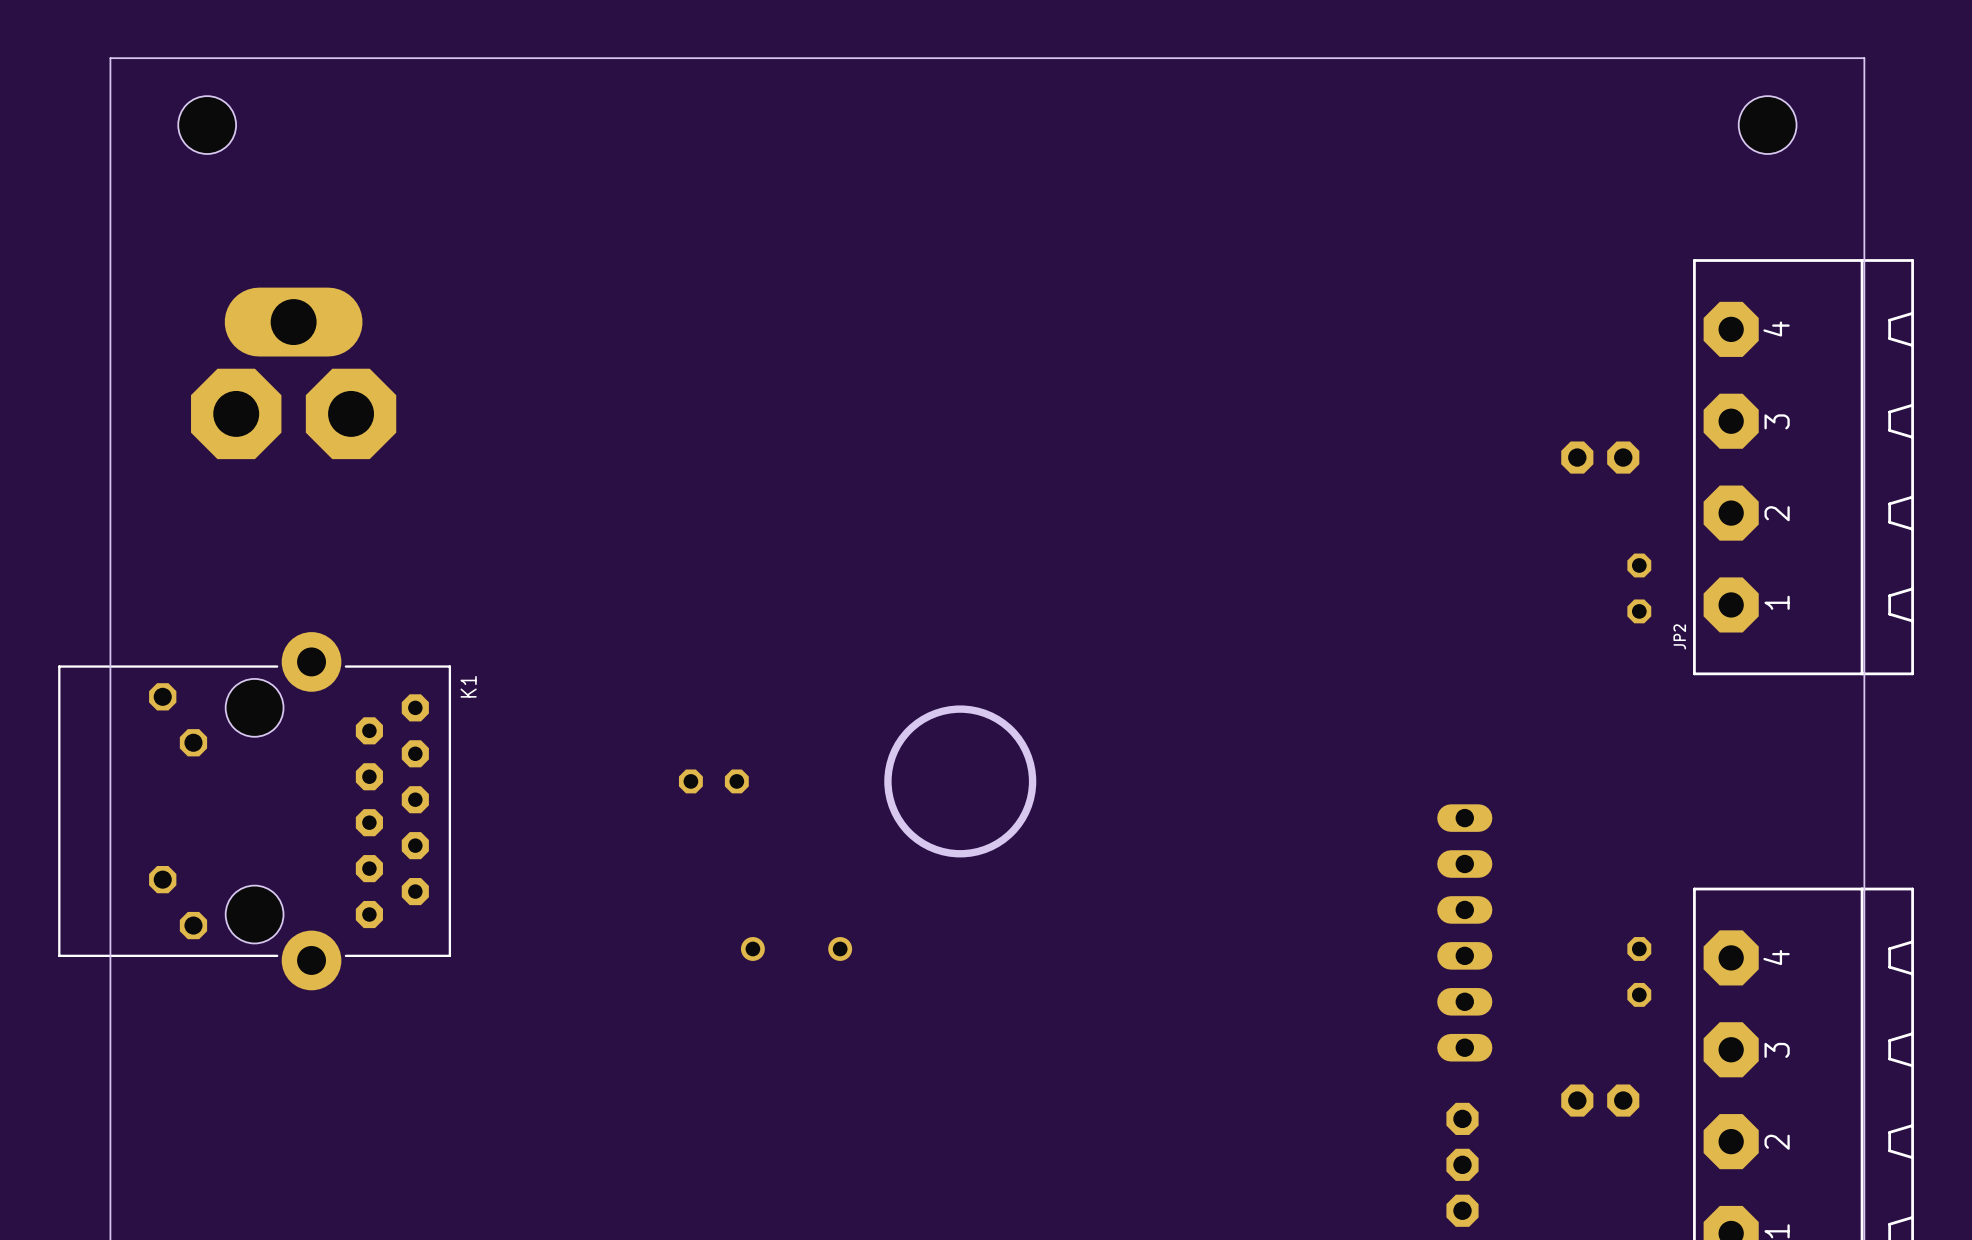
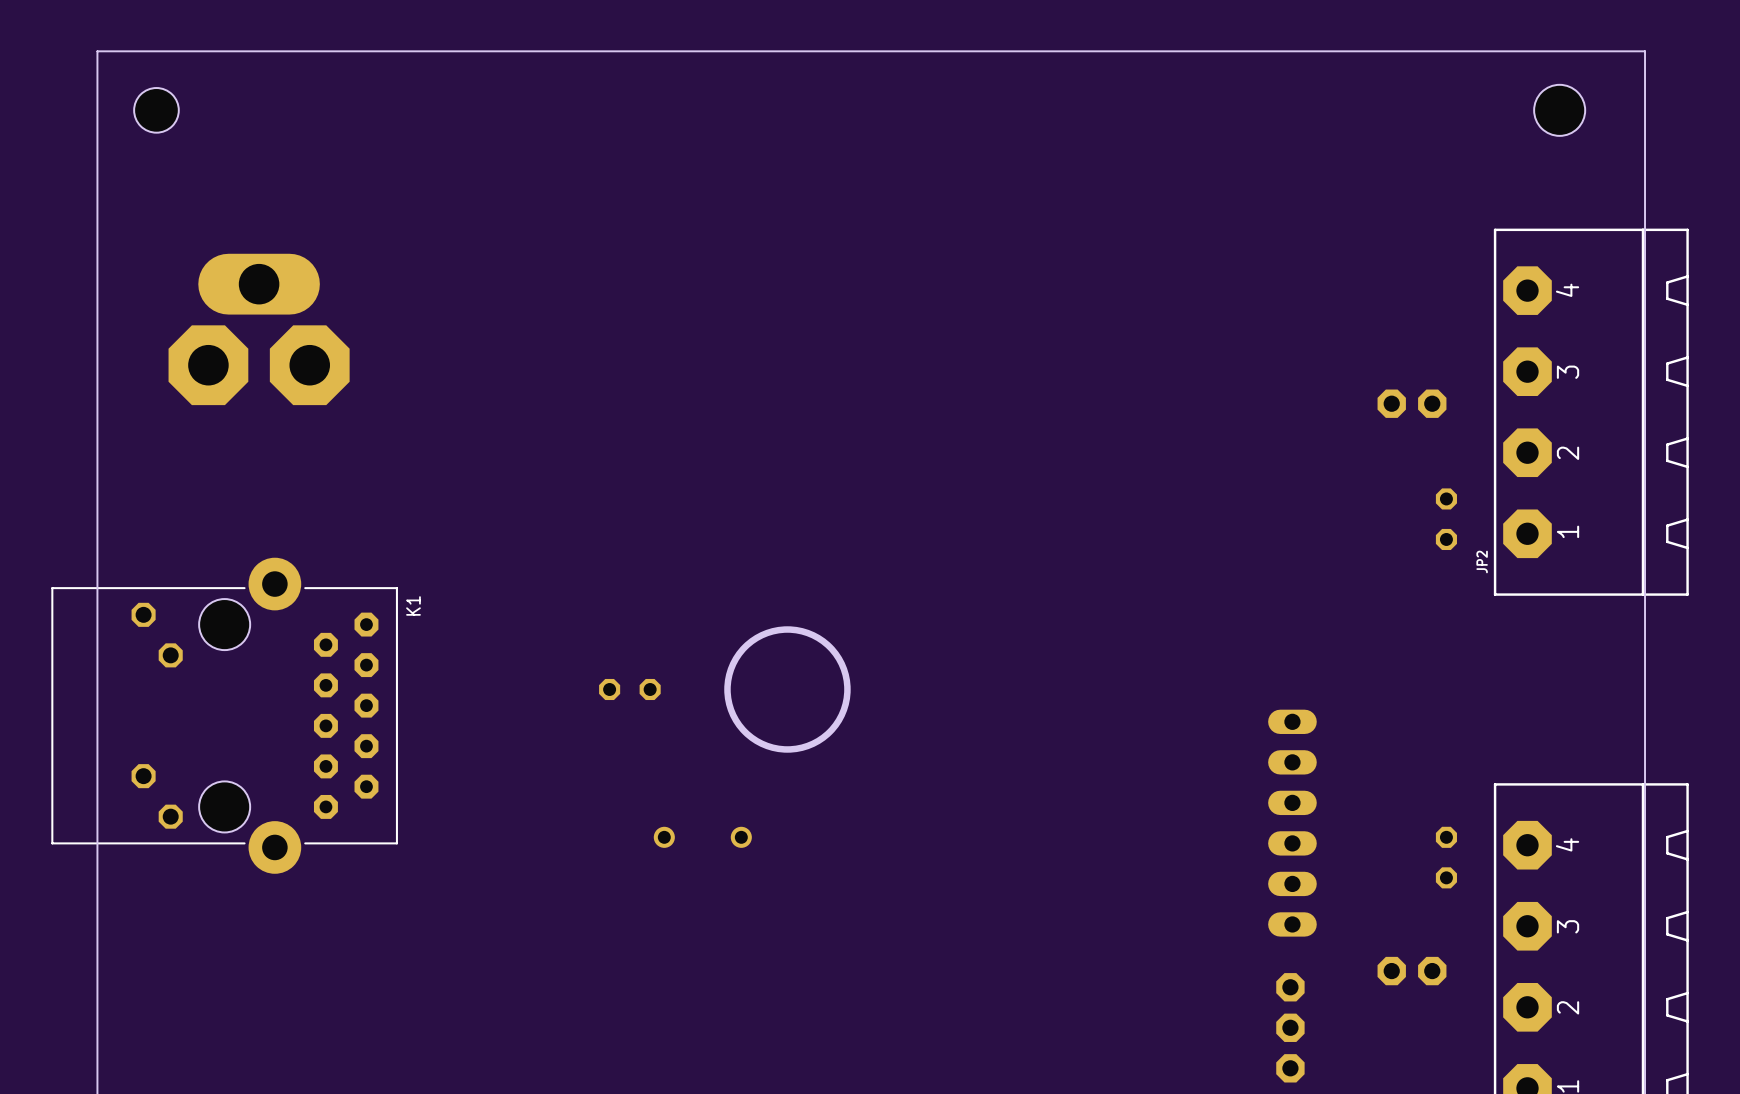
hole: none -> (156, 110)
hole: (207, 125) -> none
round board edge: [884, 705, 1037, 858] -> none
round board edge: none -> [724, 626, 851, 753]

